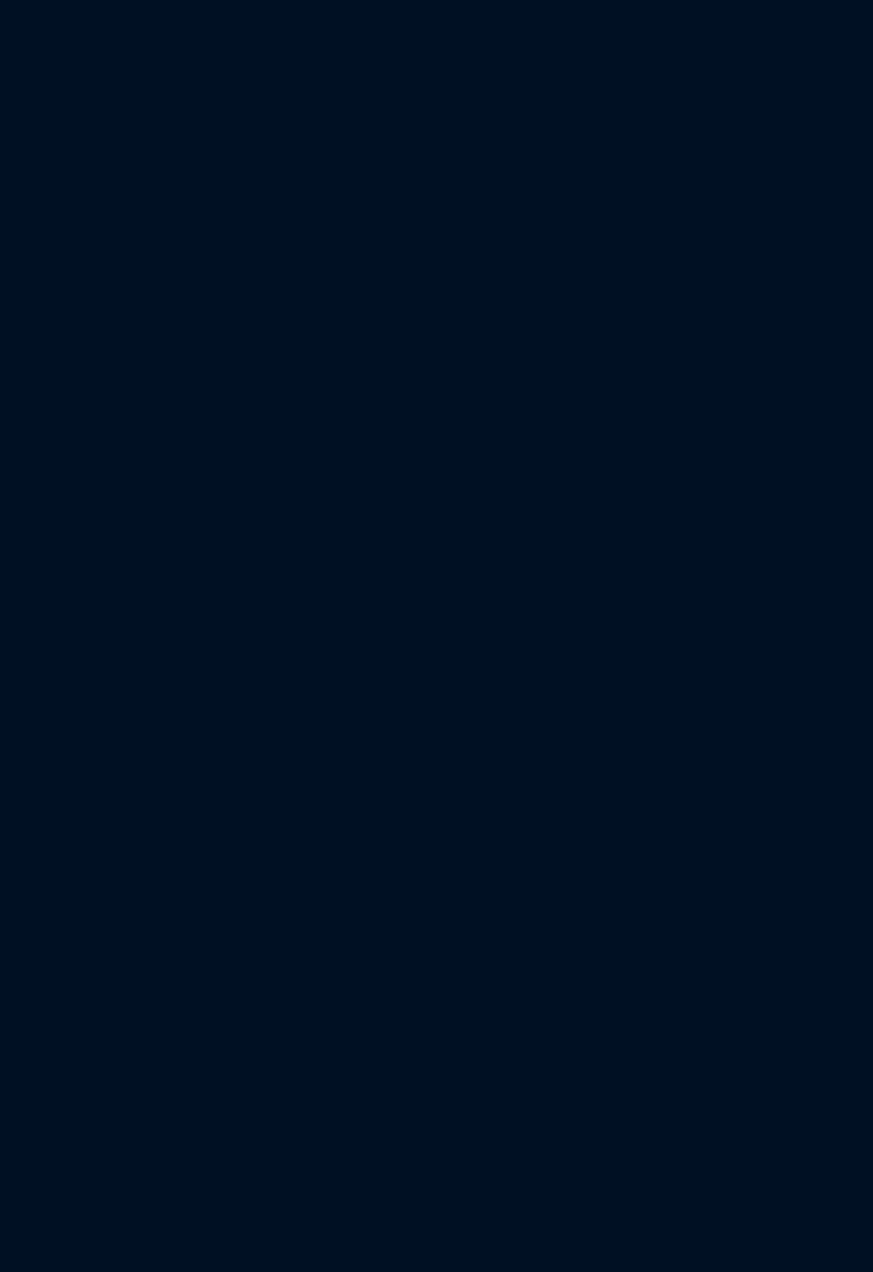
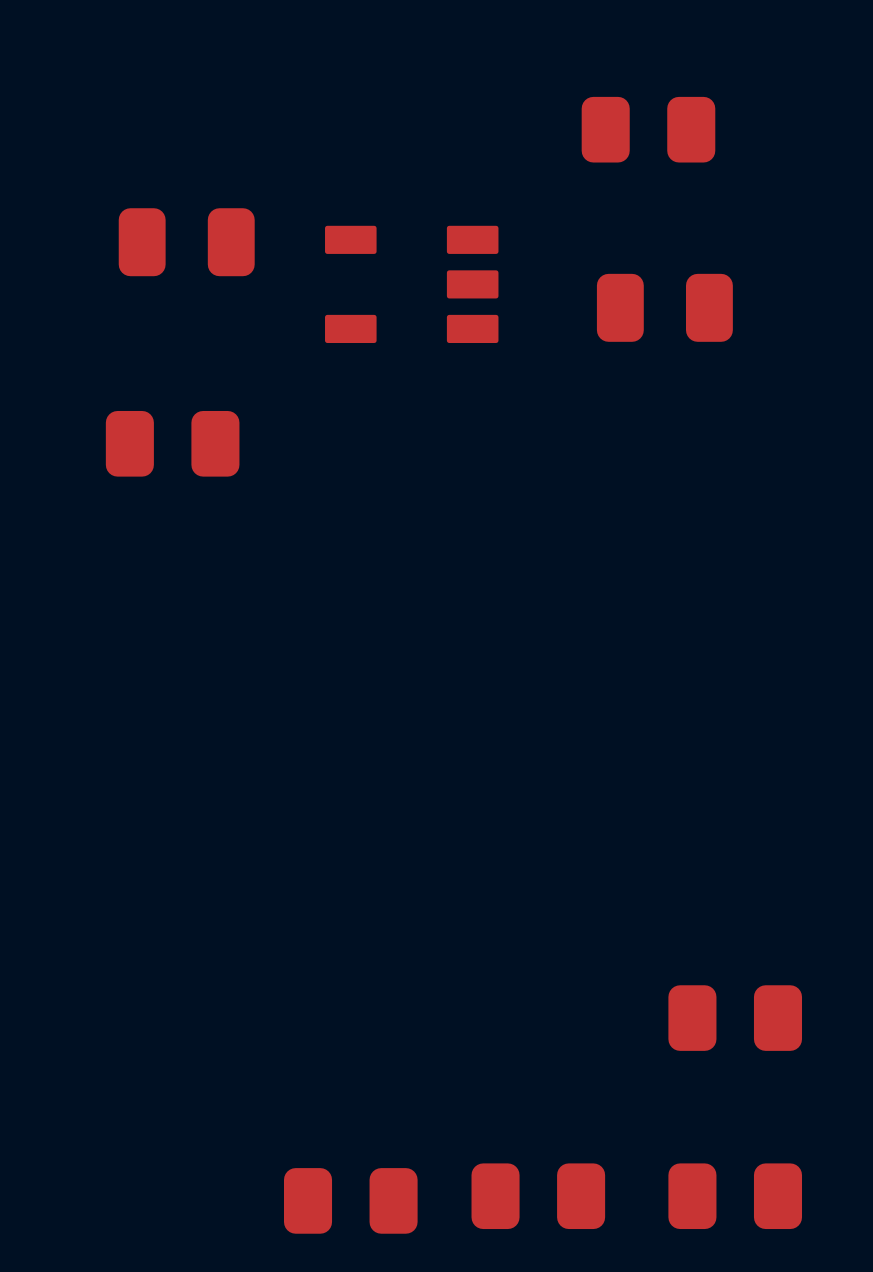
part: none -> (648, 129)
part: none -> (186, 242)
part: none -> (411, 284)
part: none -> (664, 307)
part: none -> (172, 443)
part: none -> (735, 1018)
part: none -> (538, 1196)
part: none -> (735, 1196)
part: none -> (350, 1200)

